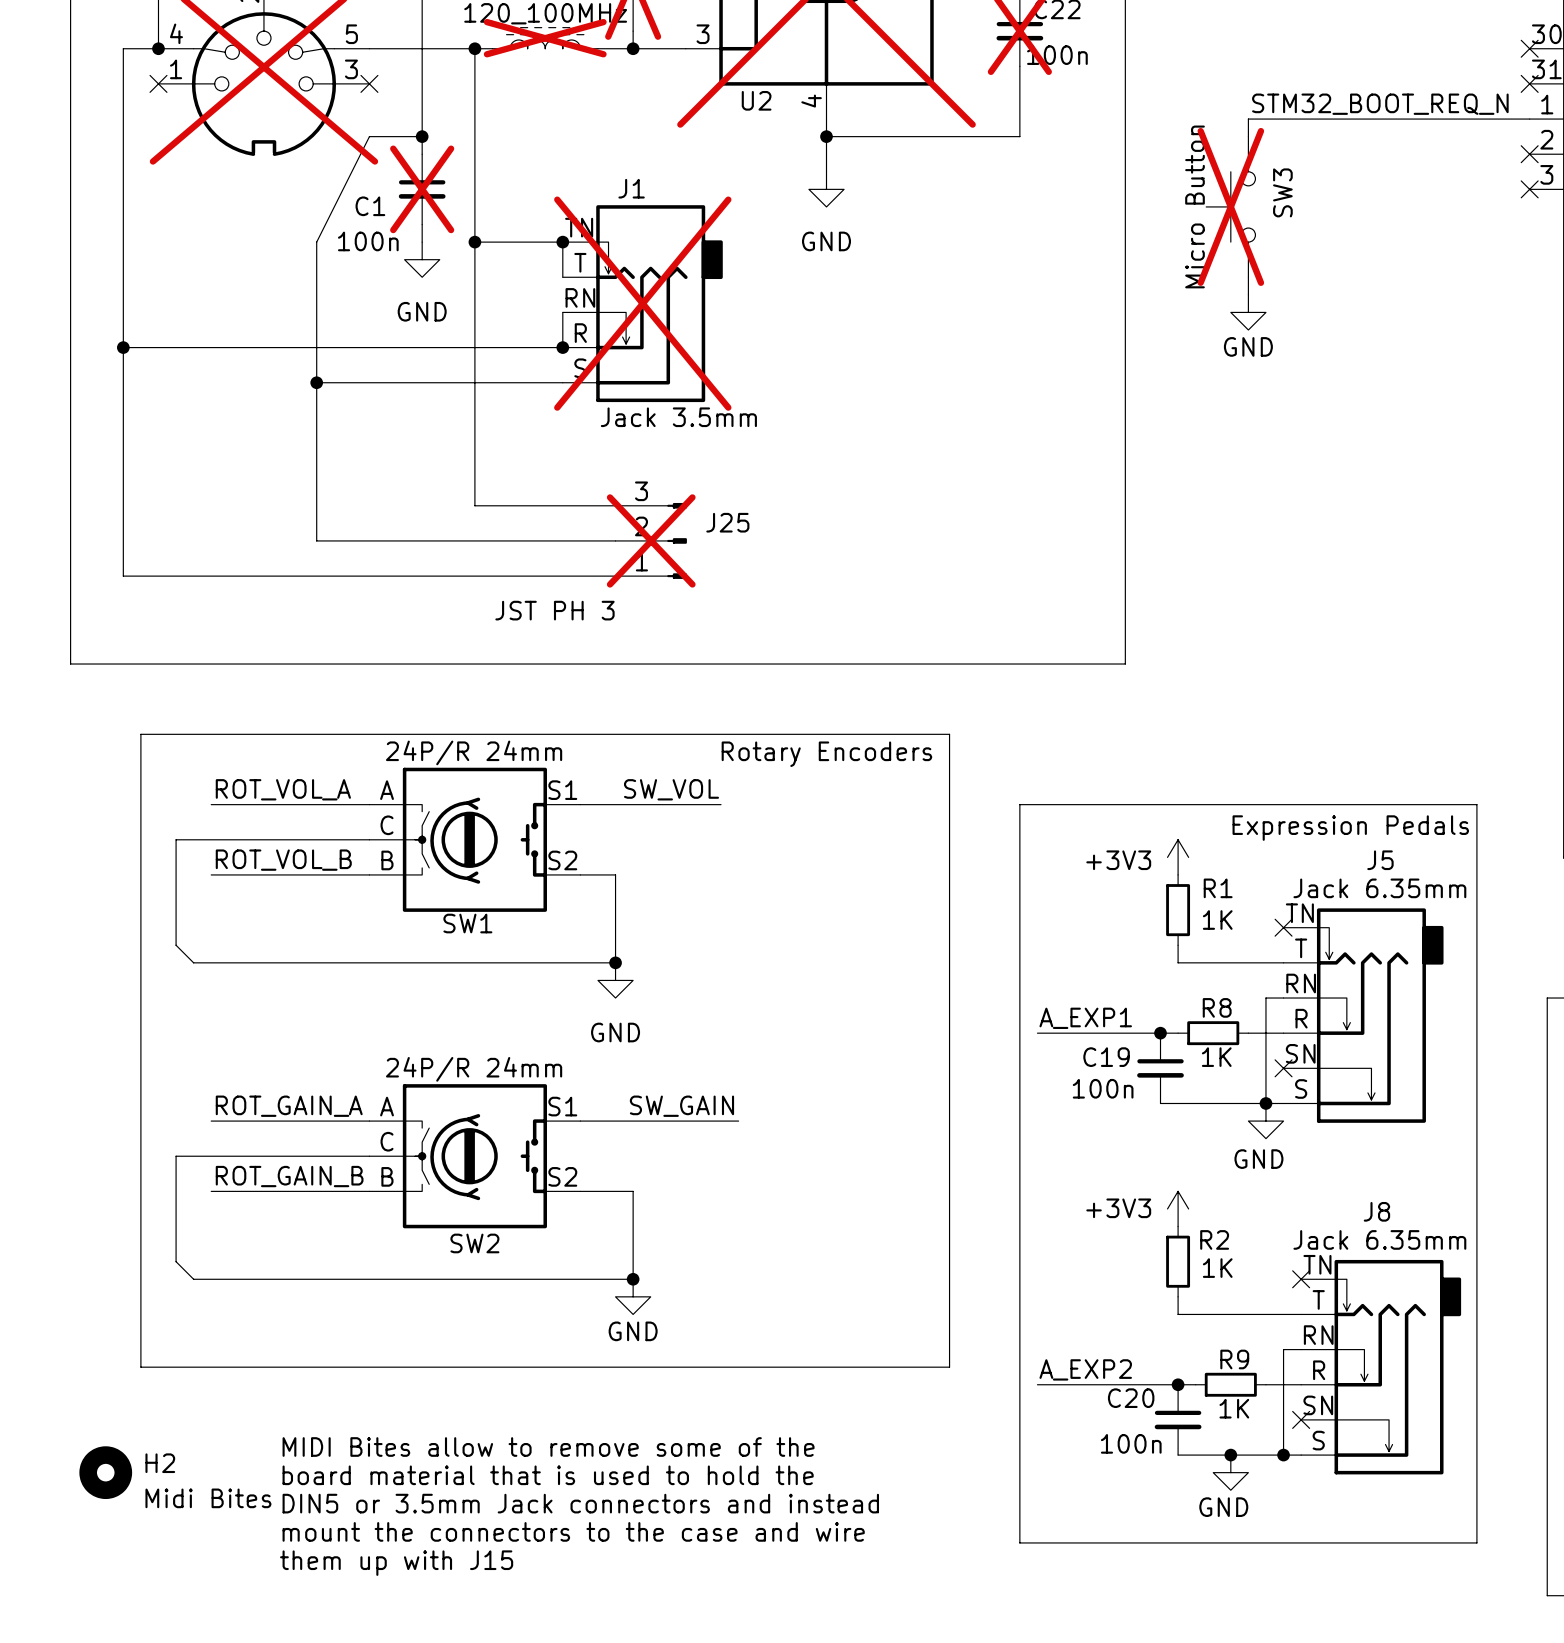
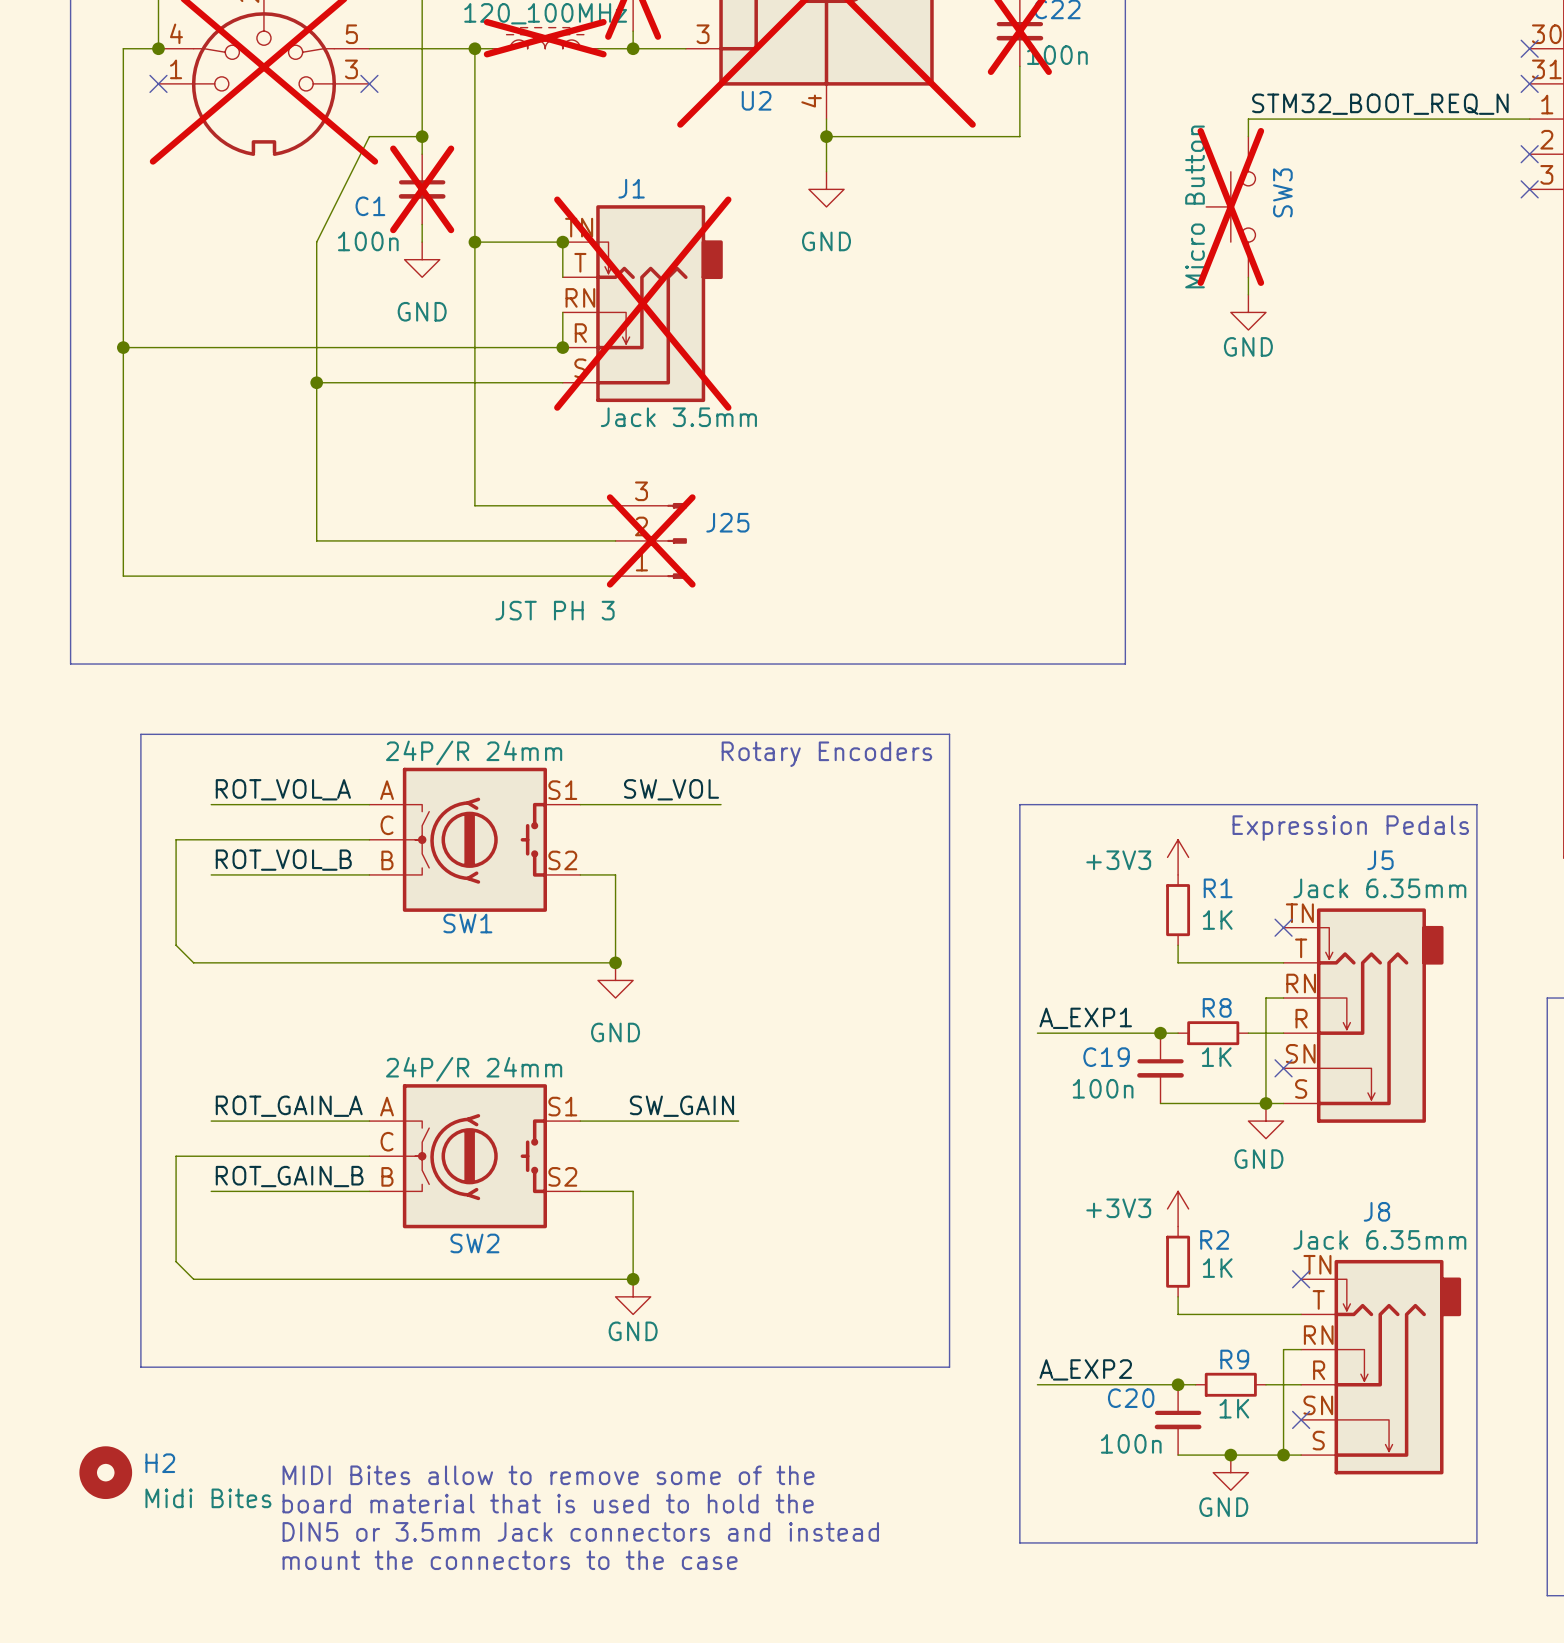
text: MIDI Bites allow to remove some of the (548, 1447) -> none
text: board material that is used to hold the (548, 1475) -> MIDI Bites allow to remove some of the (548, 1475)
text: DIN5 or 3.5mm Jack connectors and instead (580, 1503) -> board material that is used to hold the (548, 1503)
text: mount the connectors to the case and wire (573, 1531) -> DIN5 or 3.5mm Jack connectors and instead (580, 1531)
text: them up with J15 (396, 1563) -> mount the connectors to the case (510, 1560)

